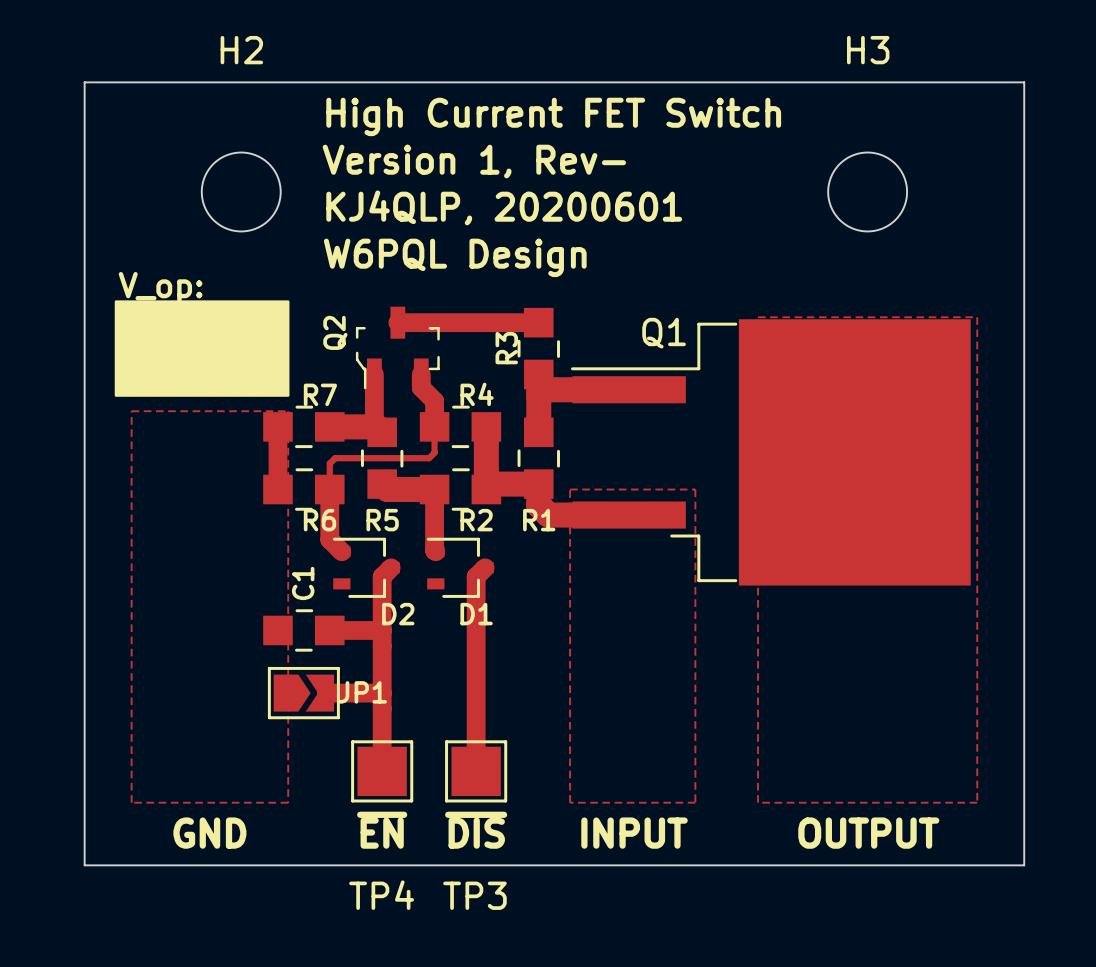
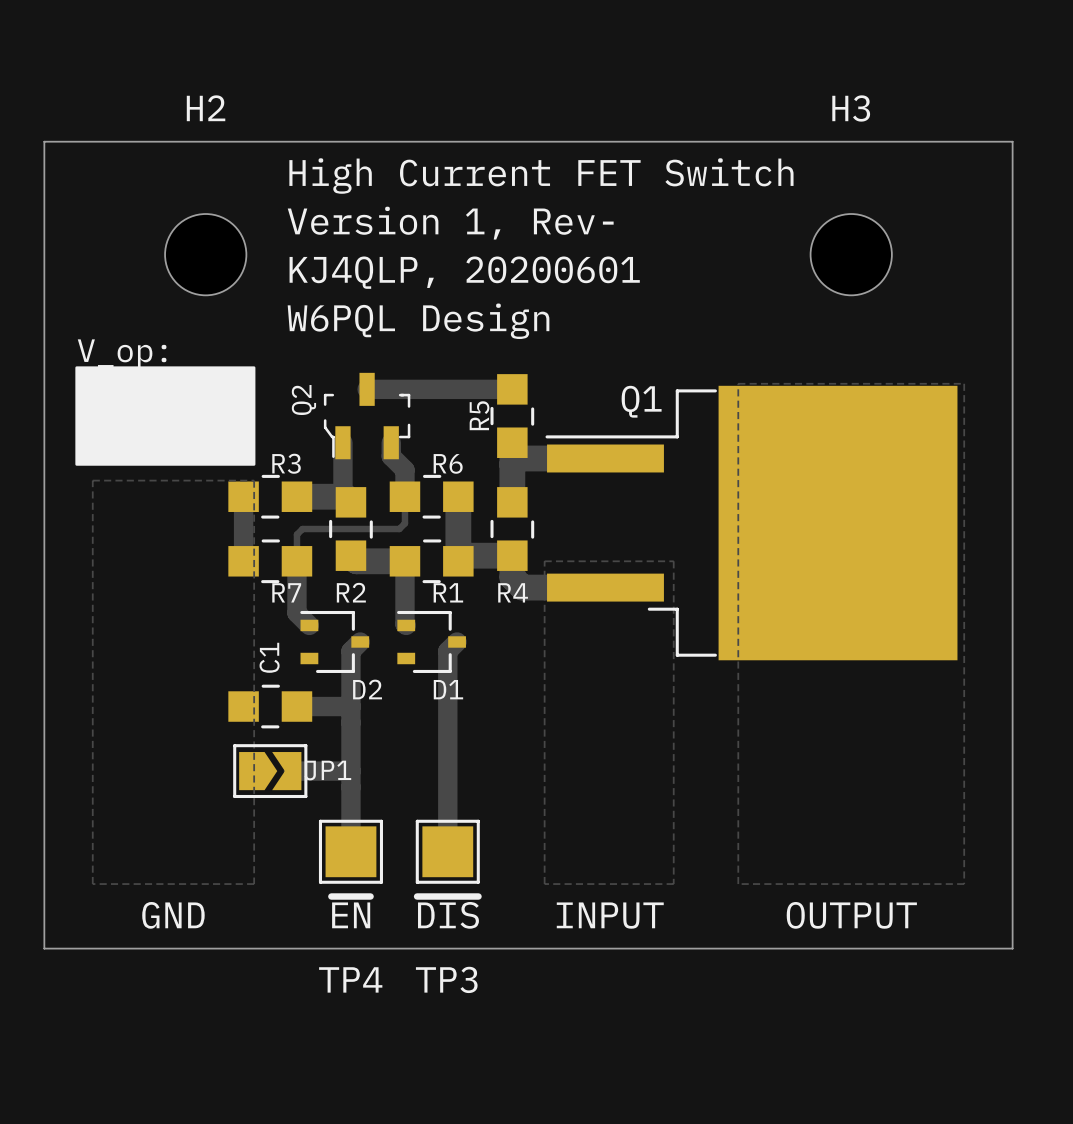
R3 name: R3 (506, 348) -> R5 (479, 415)
R7 name: R7 (320, 394) -> R3 (286, 463)
R4 name: R4 (477, 394) -> R6 (448, 463)
R6 name: R6 (319, 520) -> R7 (286, 592)
R5 name: R5 (382, 520) -> R2 (351, 592)
R2 name: R2 (476, 520) -> R1 (448, 592)
R1 name: R1 (539, 520) -> R4 (513, 592)

